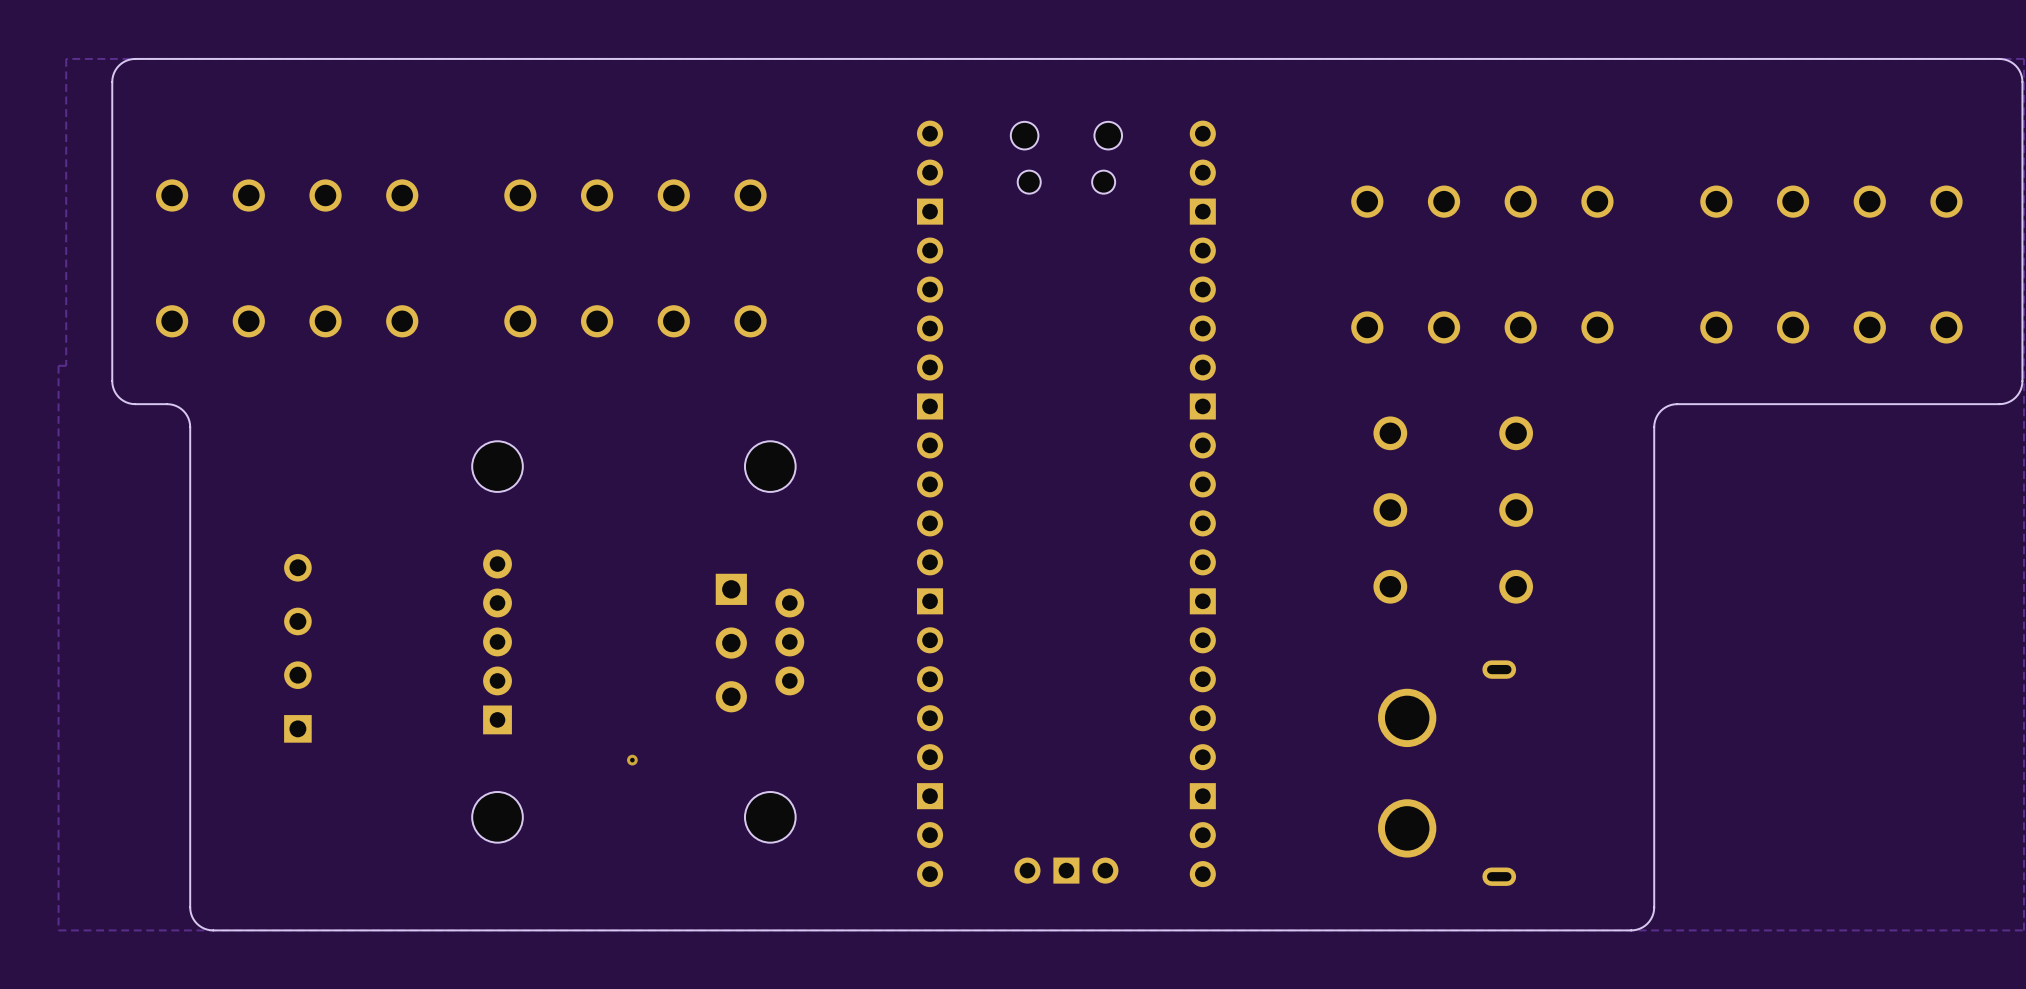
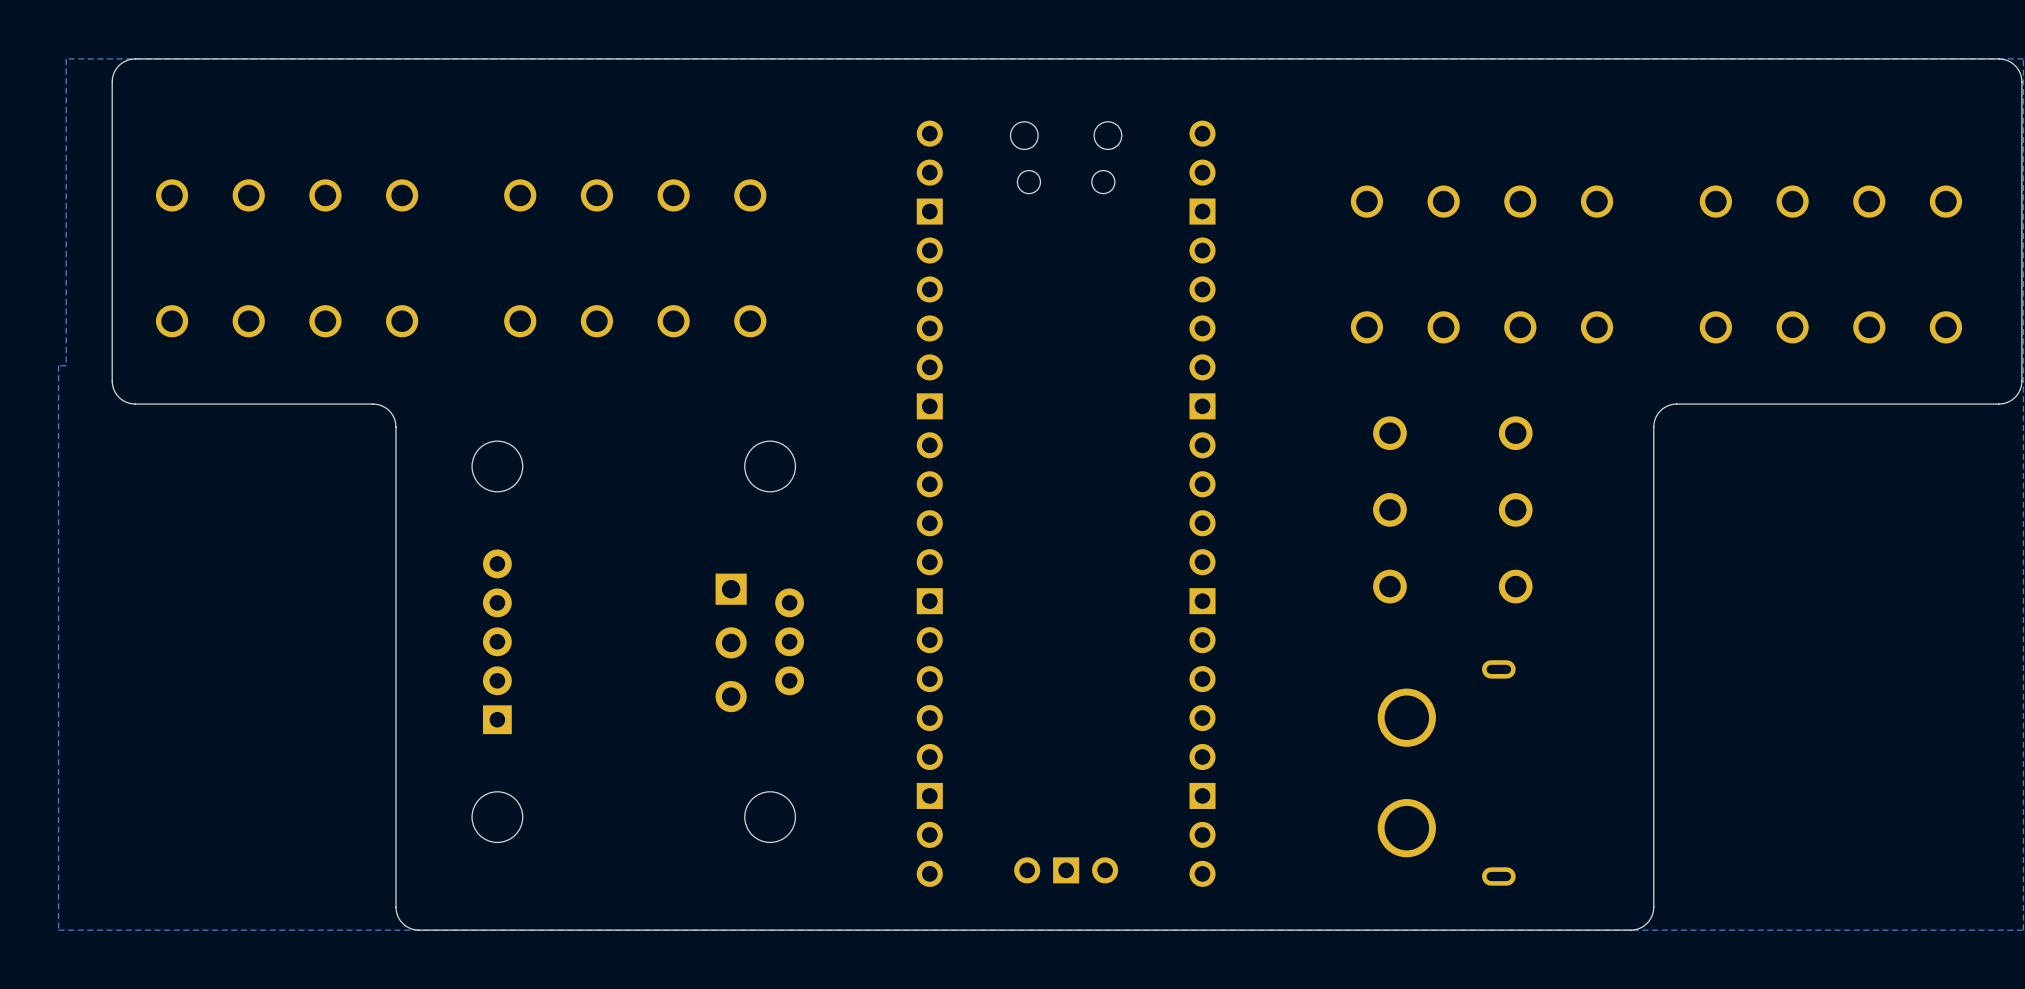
board edge: (167, 404) (175, 405) (183, 410) (188, 418) (190, 427) (190, 907) (191, 916) (201, 927) (213, 930) (419, 930) -> (167, 404) (372, 404) (386, 408) (394, 418) (395, 427) (395, 907) (397, 915) (402, 923) (410, 928) (419, 930)
part: (297, 648) -> none
via: (632, 760) -> none

